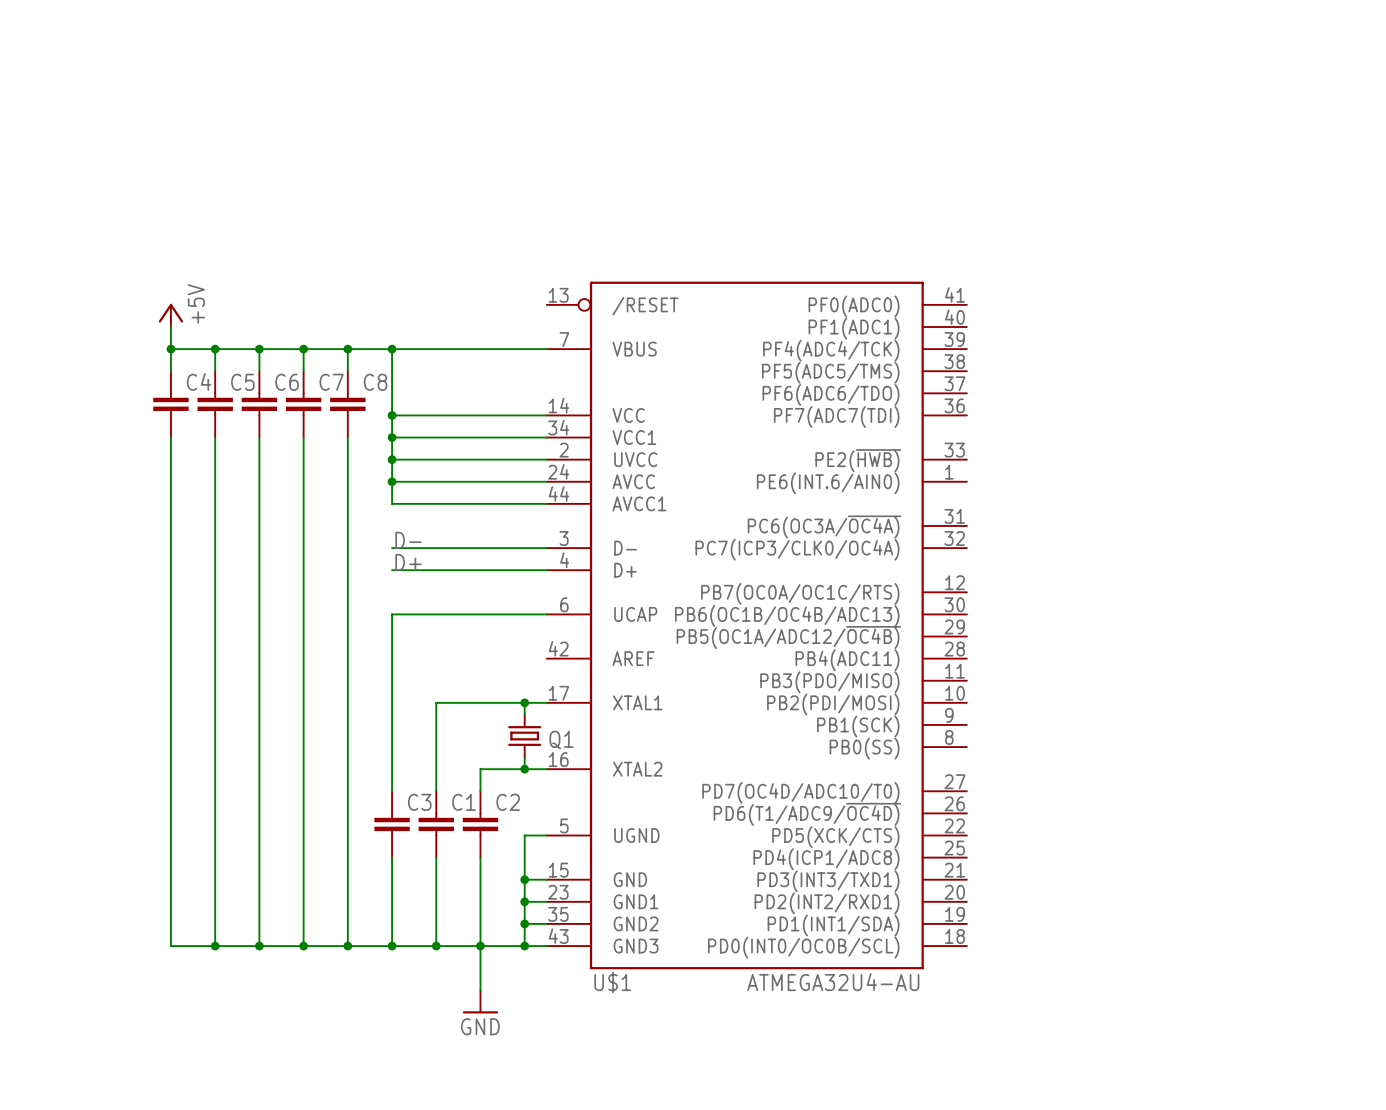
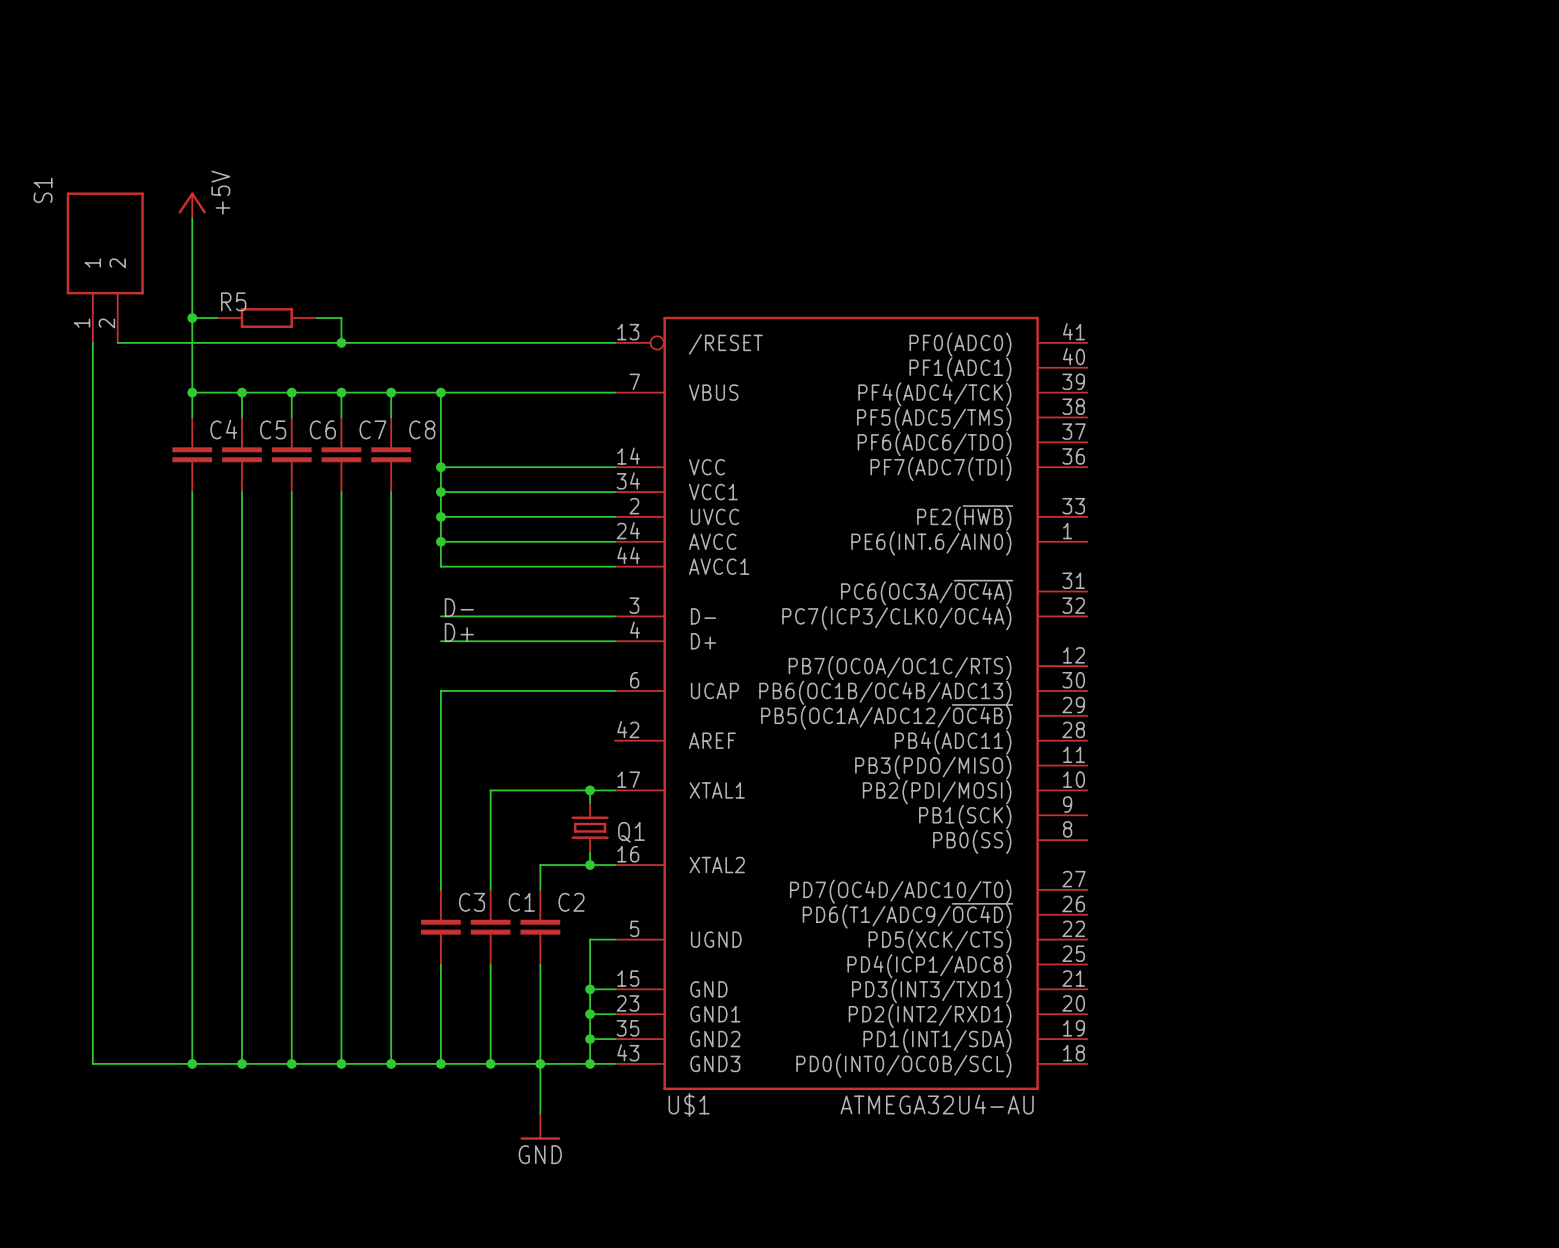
wire: none -> (192, 218) (192, 367)
S1: none -> (105, 267)
wire: none -> (192, 318) (217, 318)
junction: none -> (192, 318)
R5: none -> (266, 318)
wire: none -> (316, 318) (341, 318) (341, 342)
wire: none -> (92, 342) (92, 1063) (192, 1063)
wire: none -> (117, 342) (614, 342)
junction: none -> (341, 342)
power symbol position: +5V (170, 315) -> +5V (192, 205)
junction: none -> (192, 1063)

